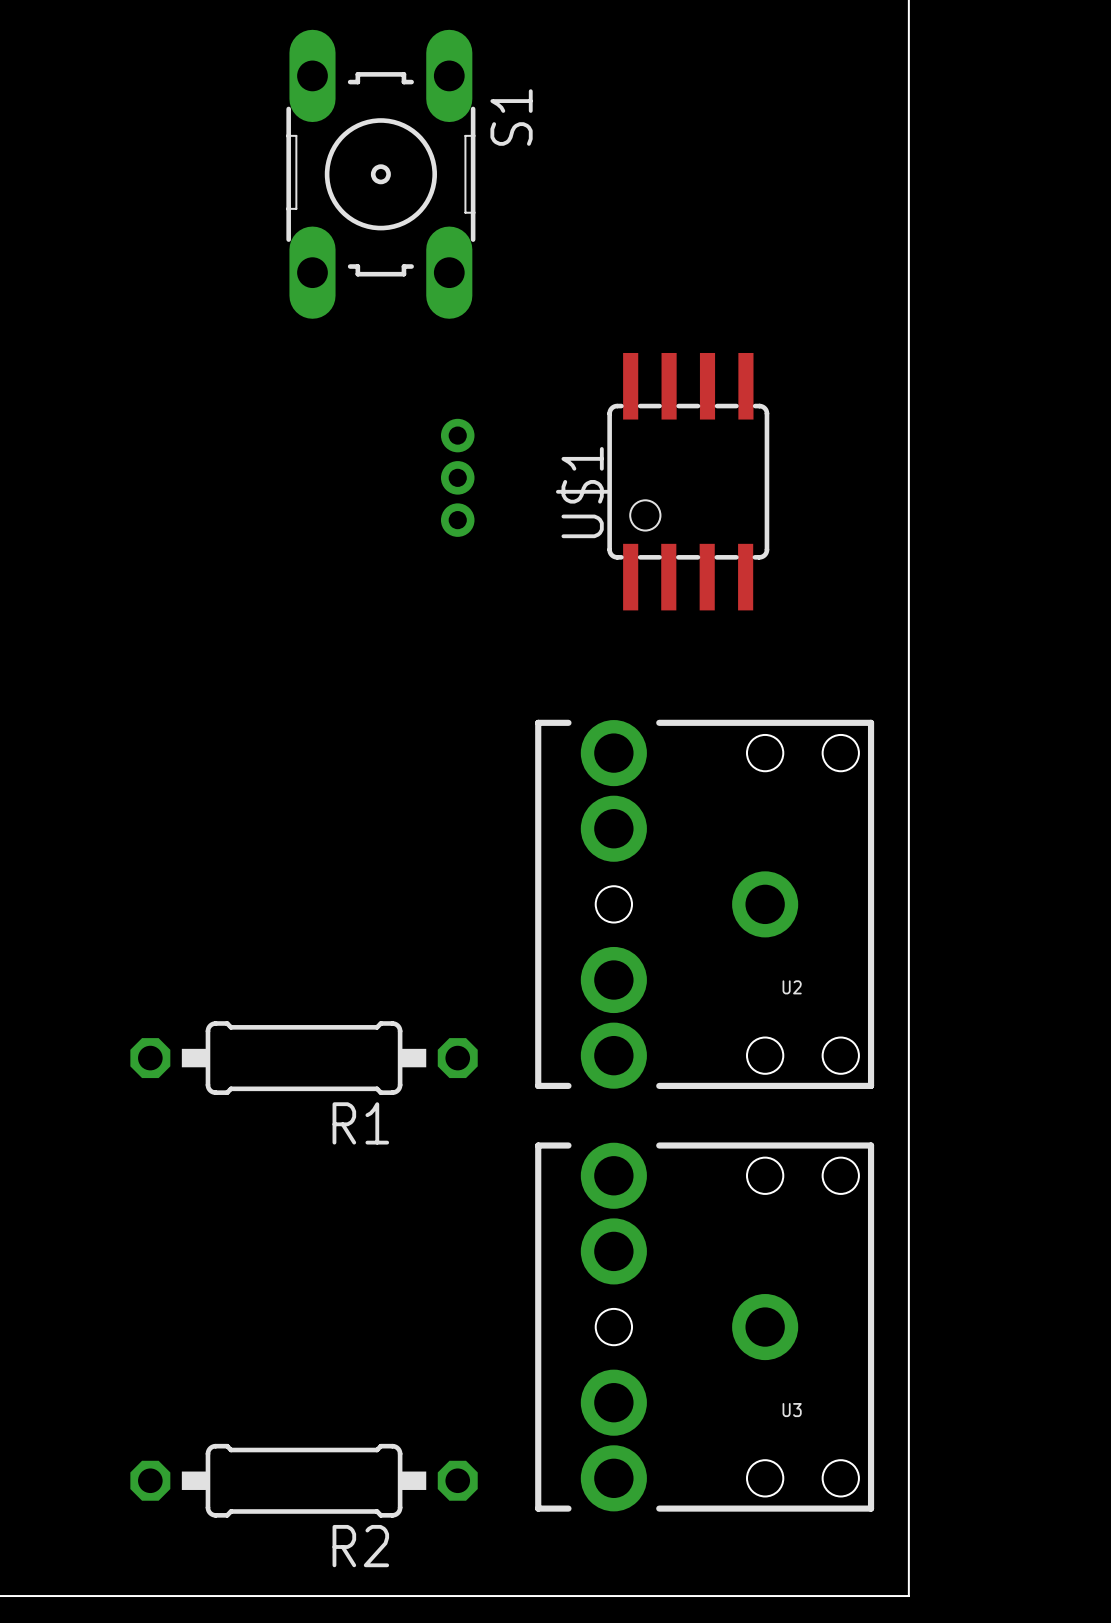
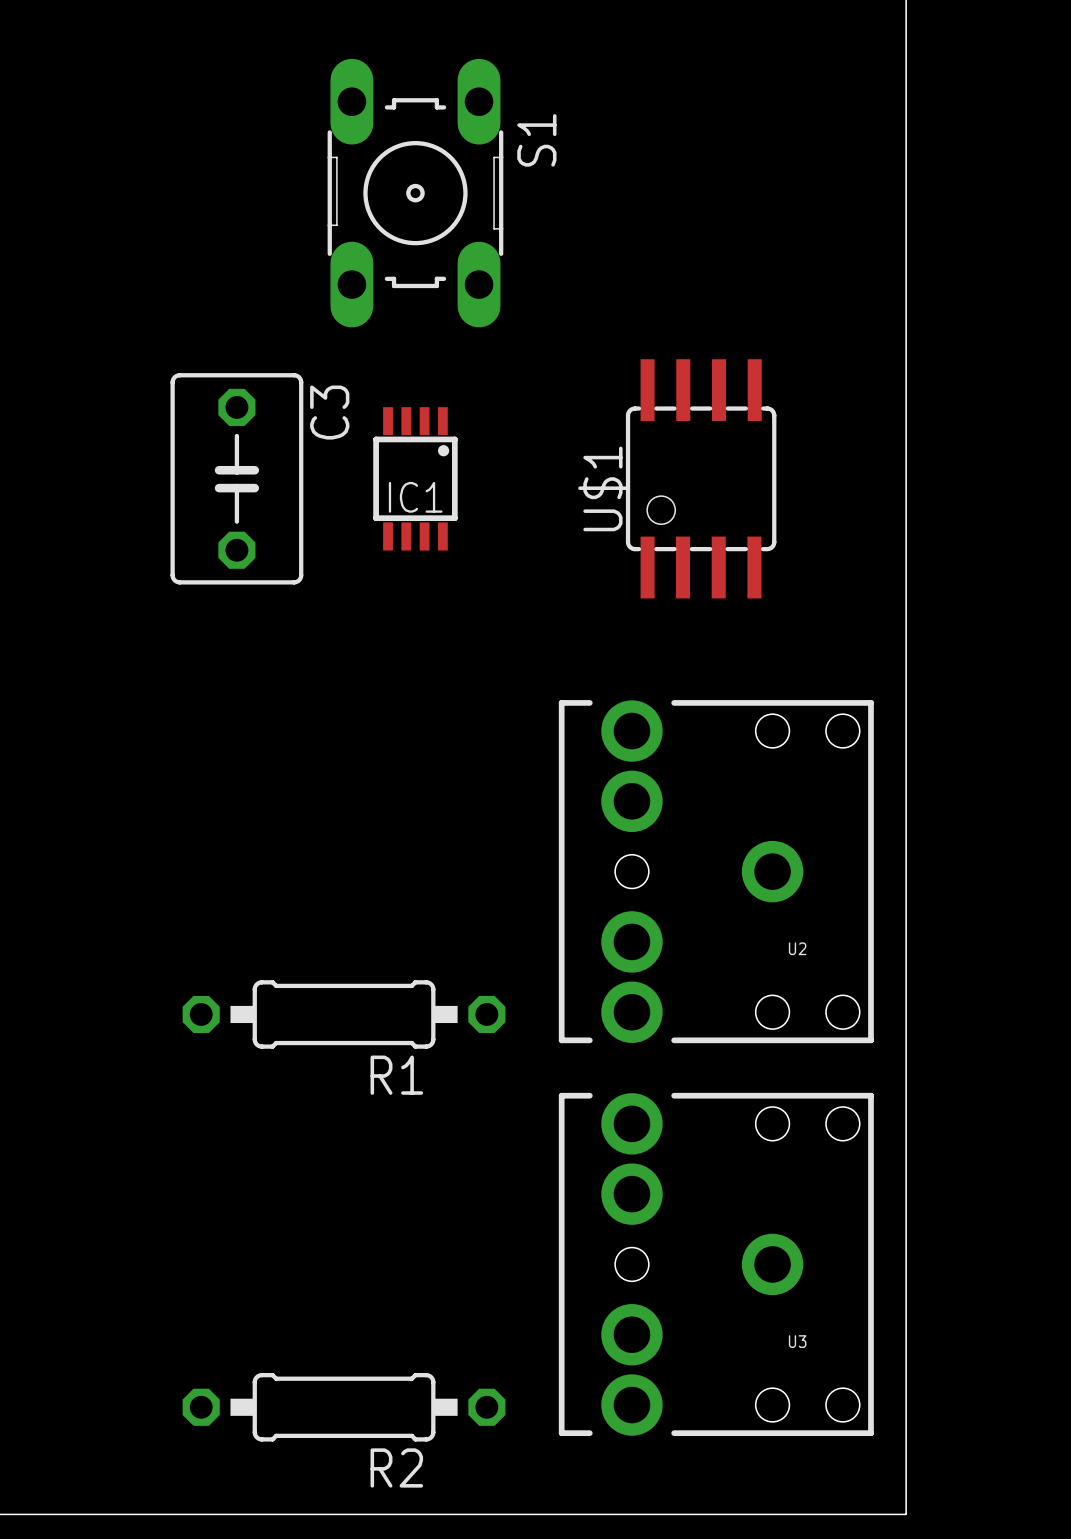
part: (457, 477) -> none
C3: none -> (236, 478)
IC1: none -> (415, 478)

